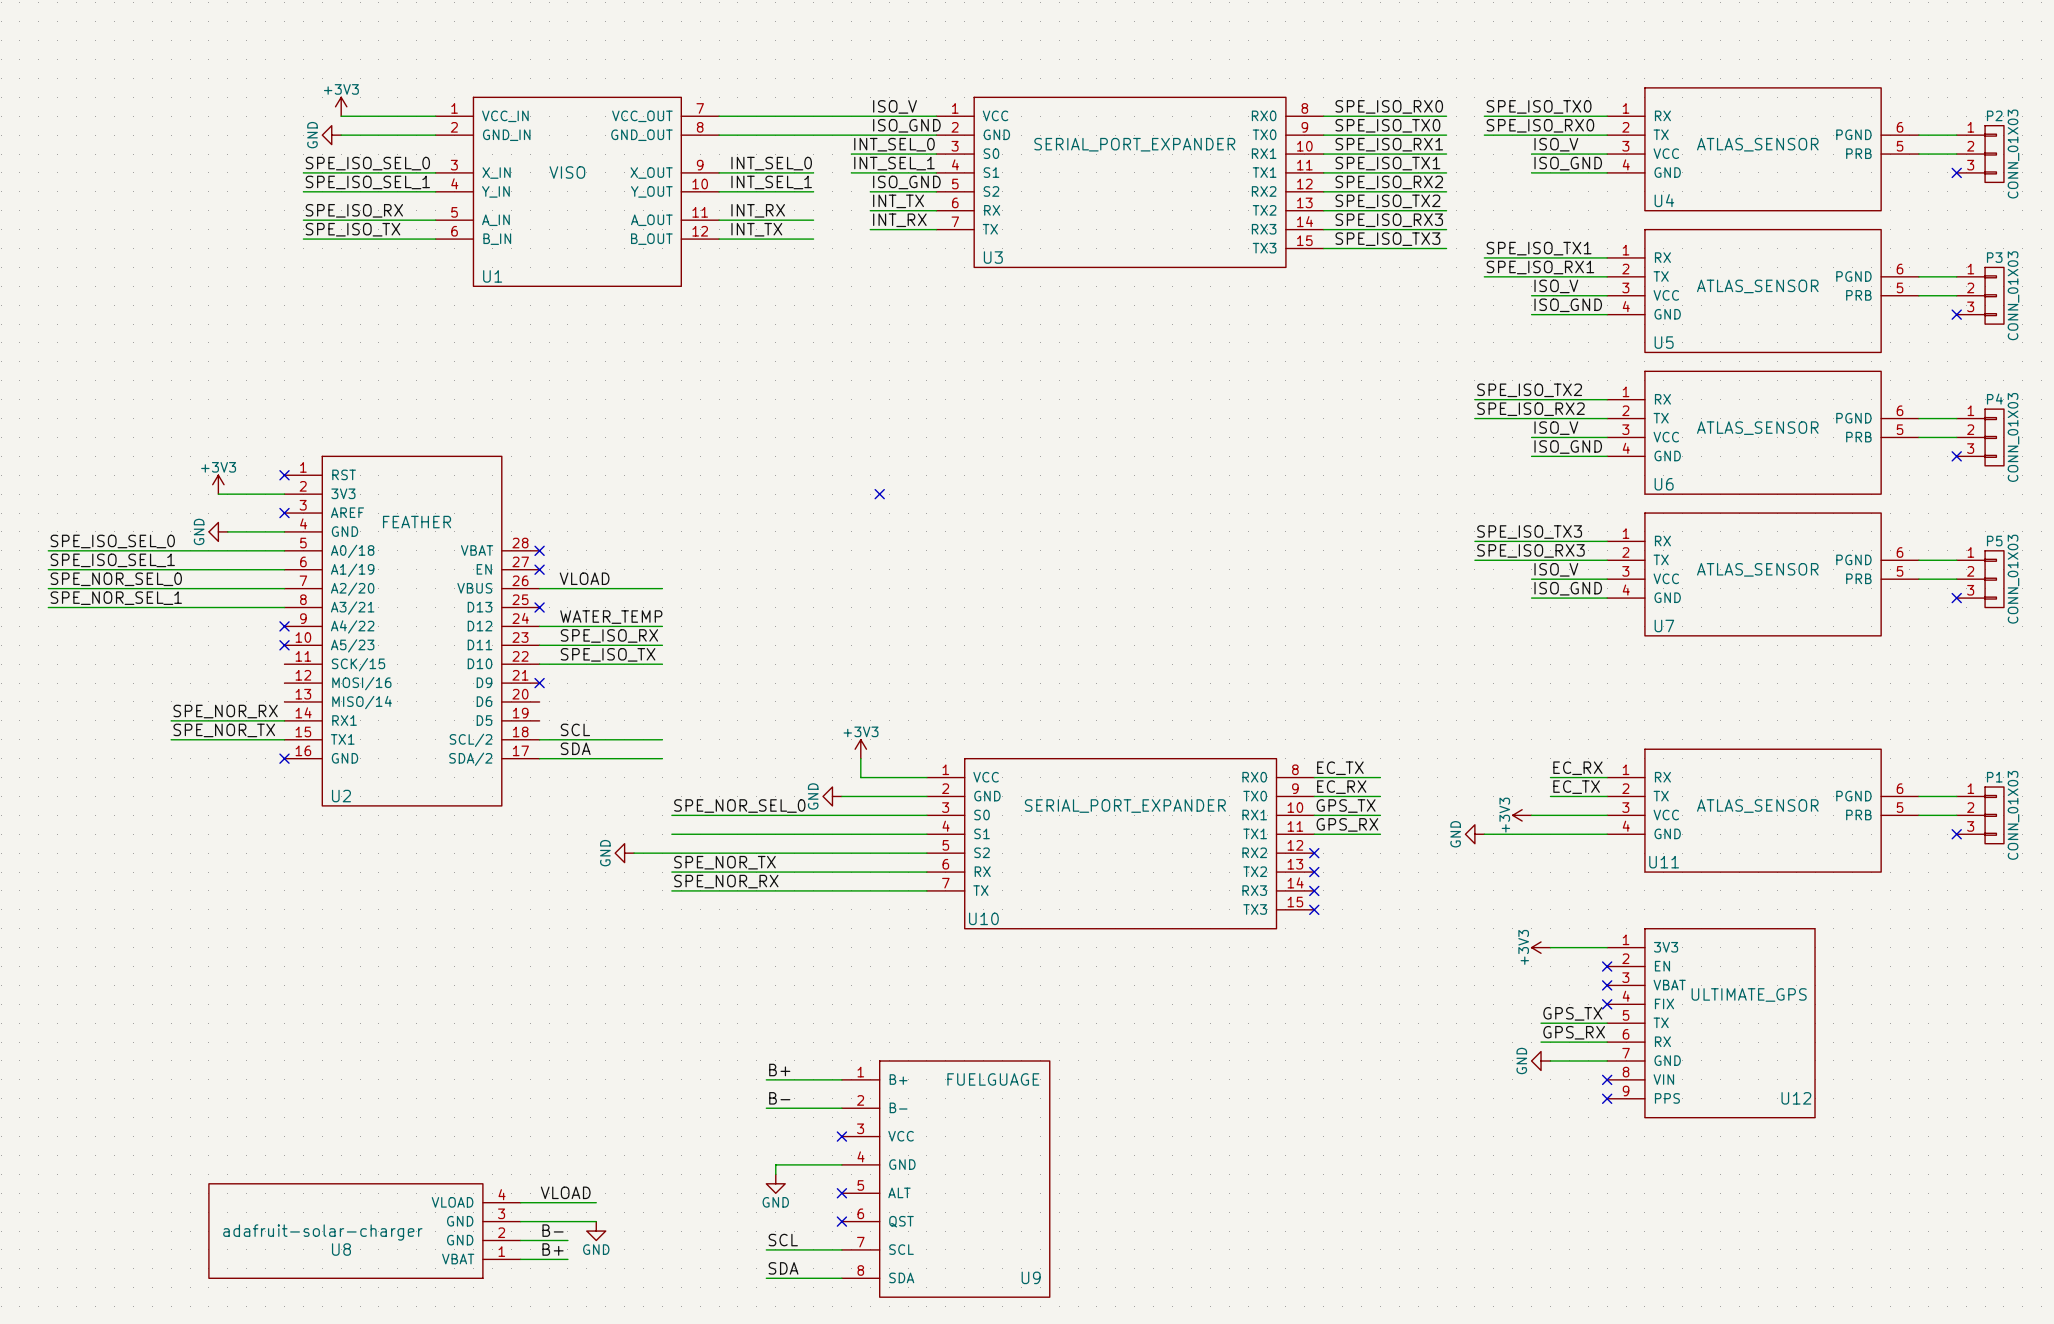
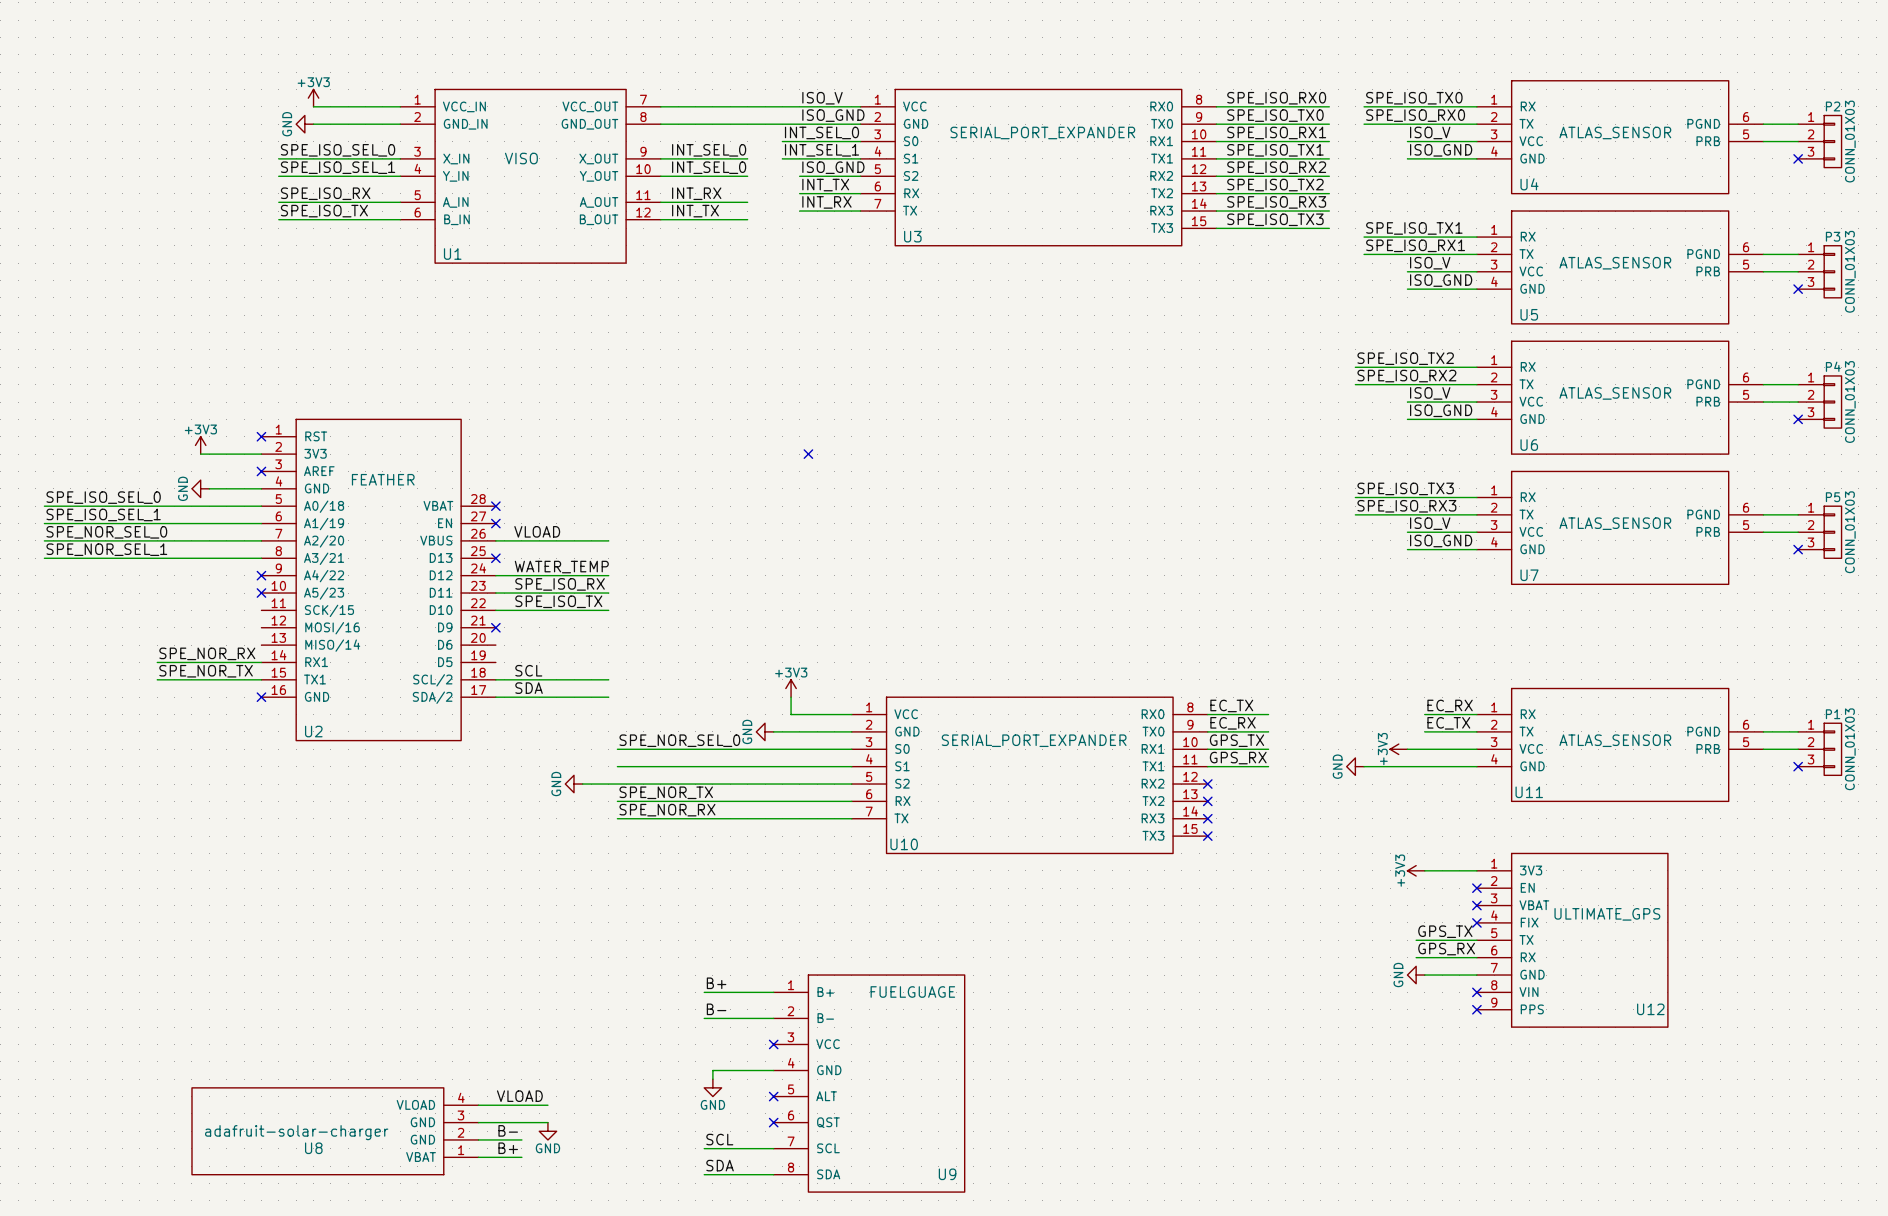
label: INT_SEL_1 (771, 182) -> INT_SEL_0 (709, 167)

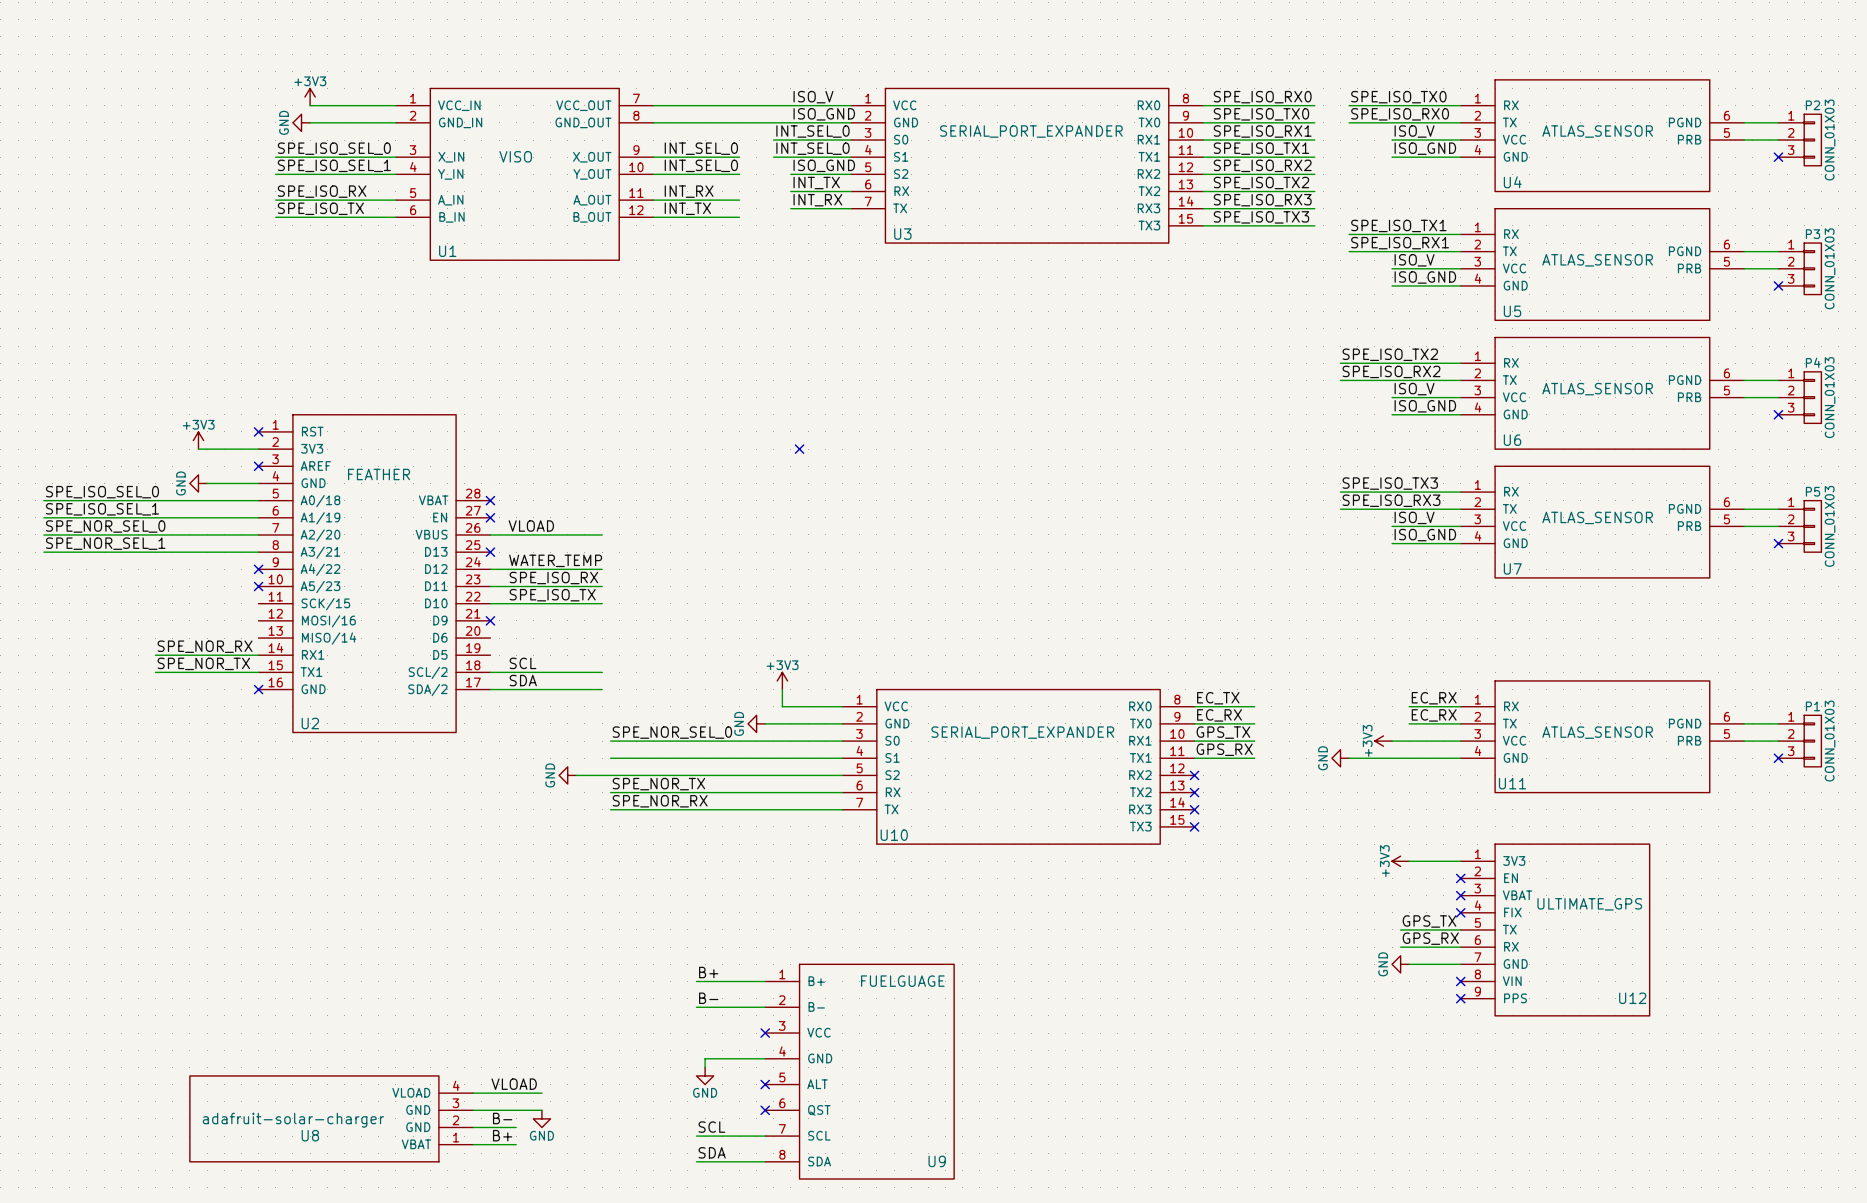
label: INT_SEL_1 (821, 150) -> INT_SEL_0 (812, 148)
label: EC_TX (1448, 723) -> EC_RX (1434, 715)

